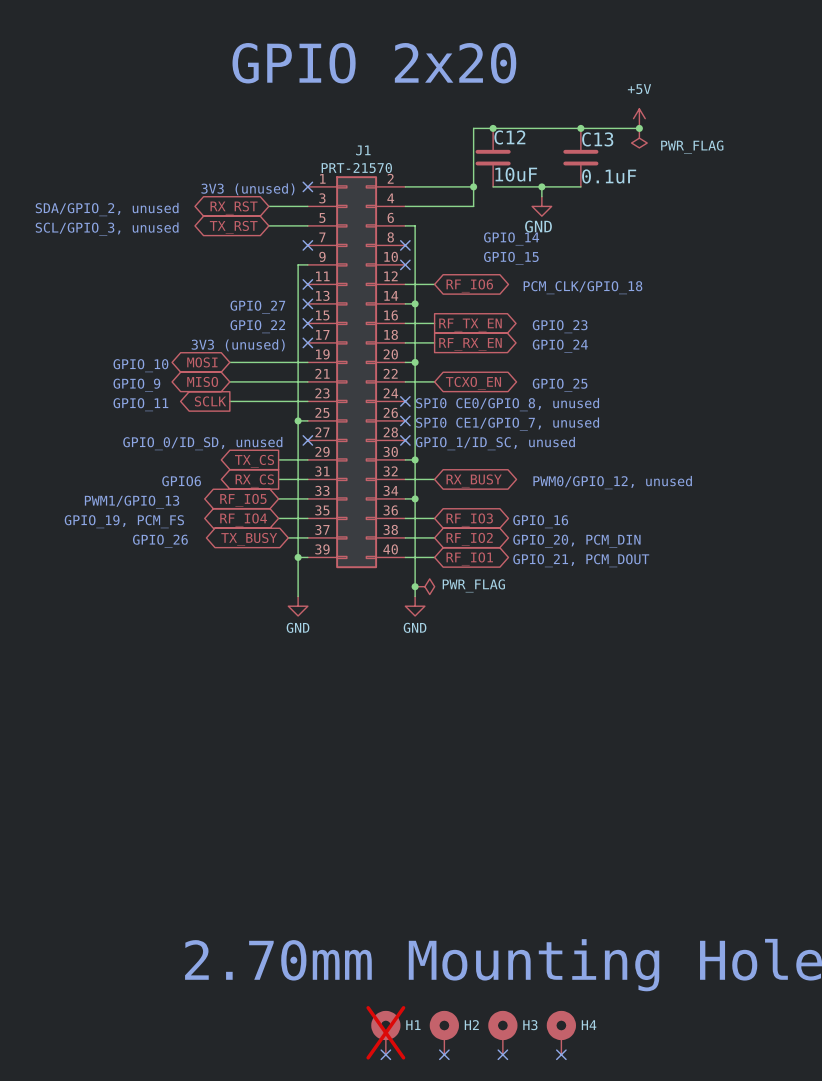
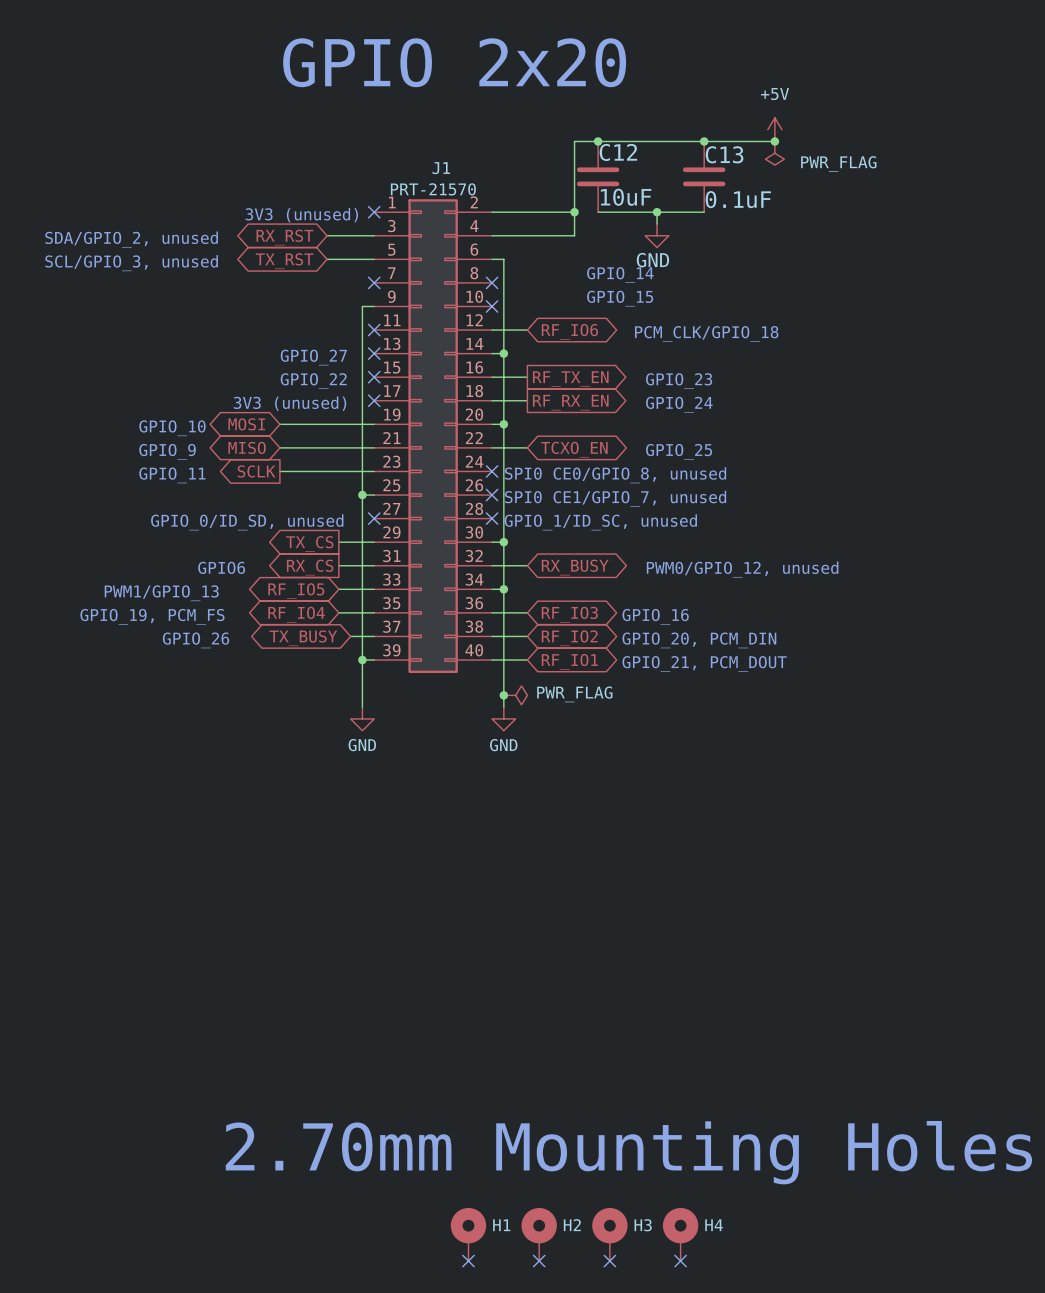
H1 do-not-place cross: (385, 1032) -> none

